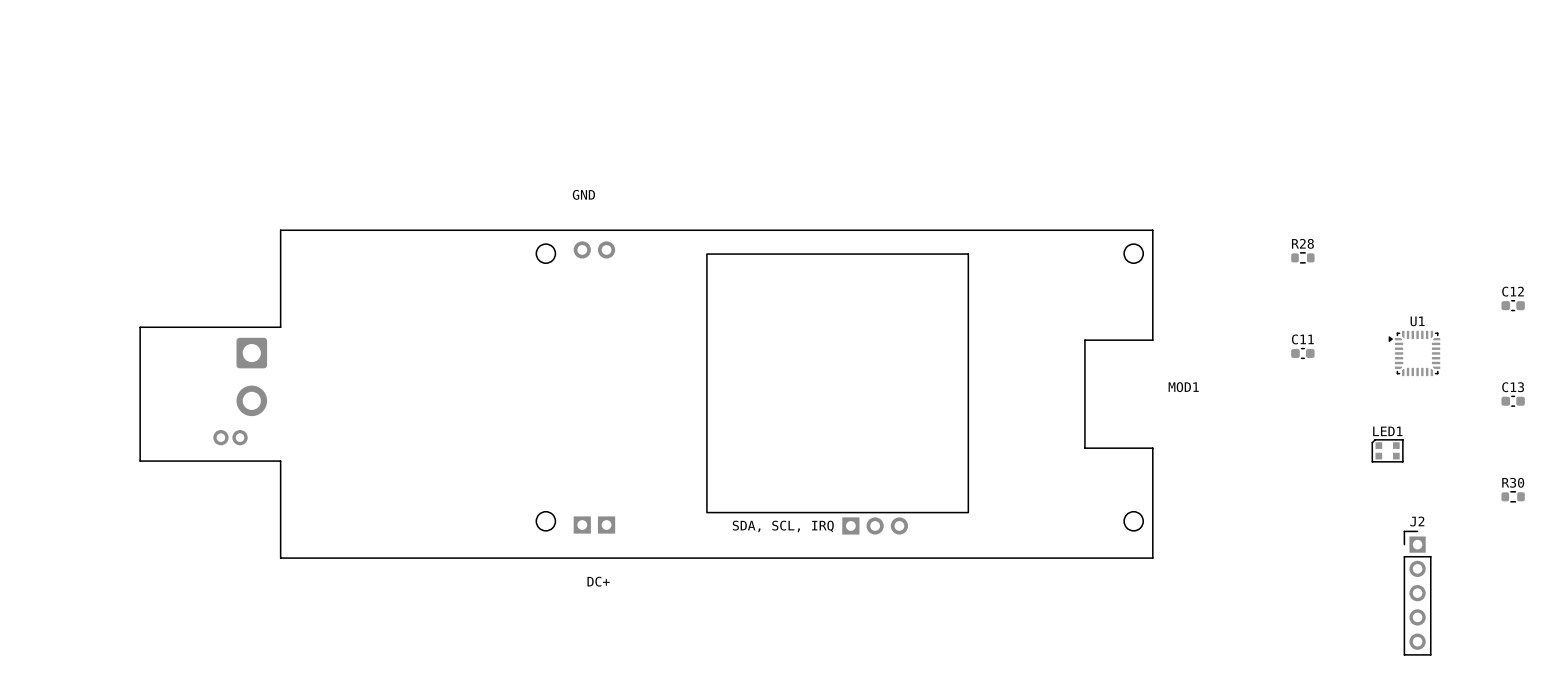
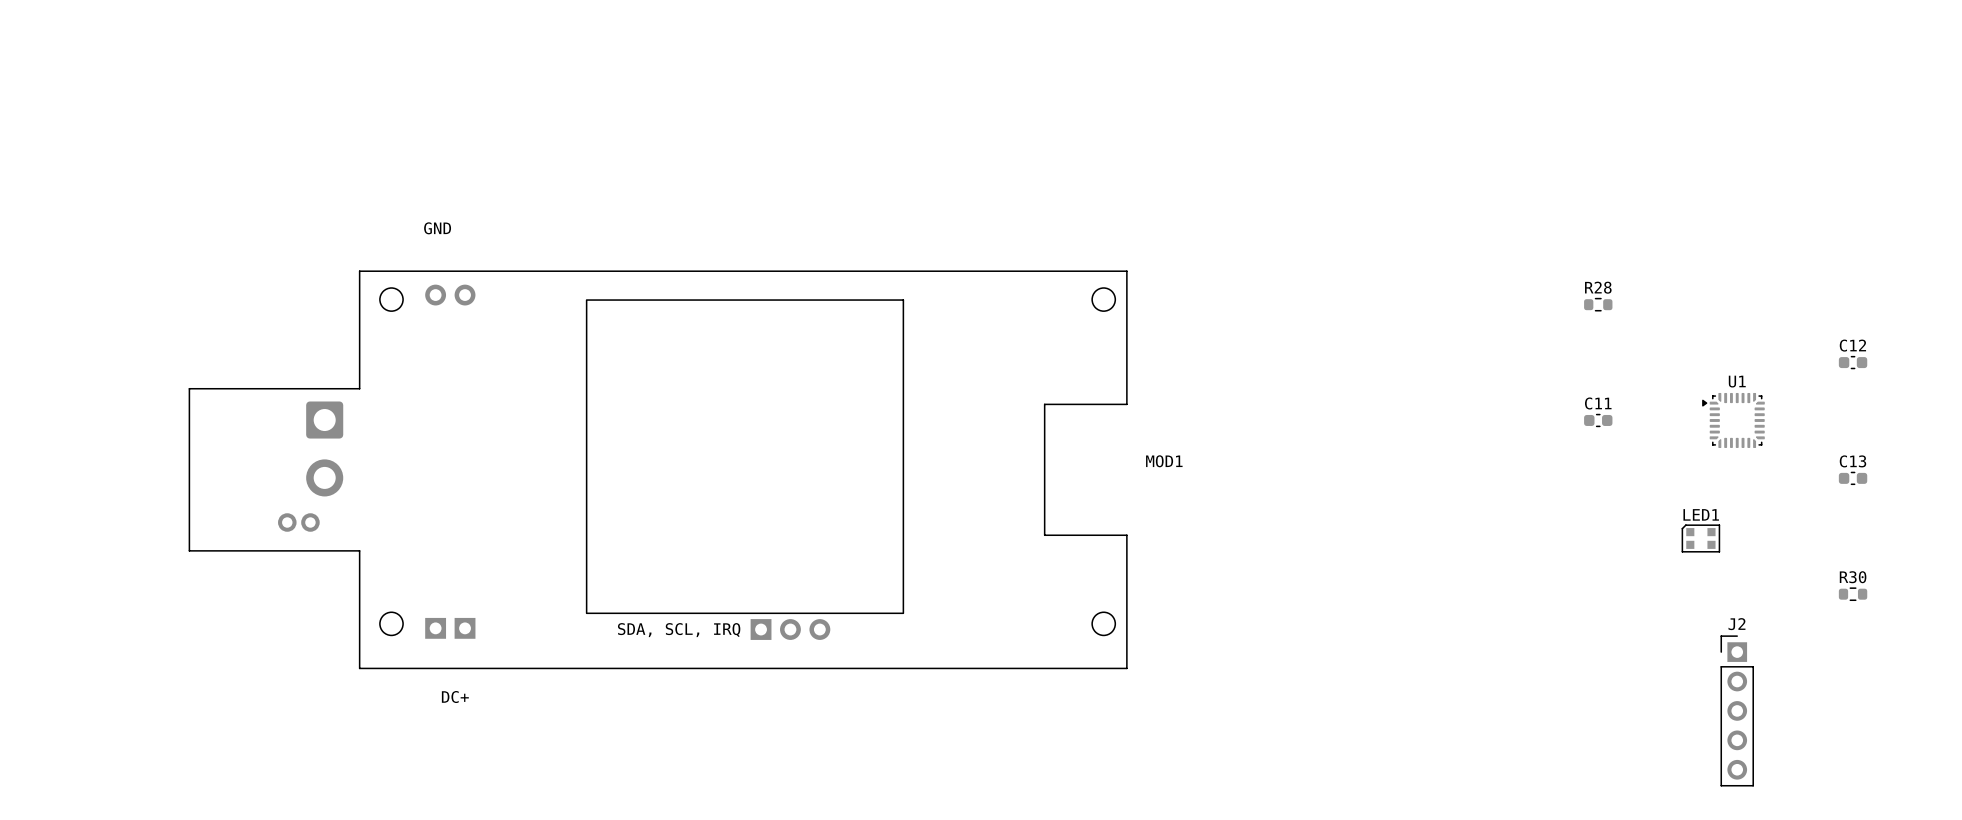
board edge: (913, 230) (1152, 230) (1152, 340) -> (1126, 271) (1126, 404)
MOD1 position: (844, 387) -> (753, 462)
board edge: (1152, 448) (1152, 558) (913, 558) -> (1126, 535) (1126, 668)
text position: SDA, SCL, IRQ (783, 526) -> SDA, SCL, IRQ (679, 630)

